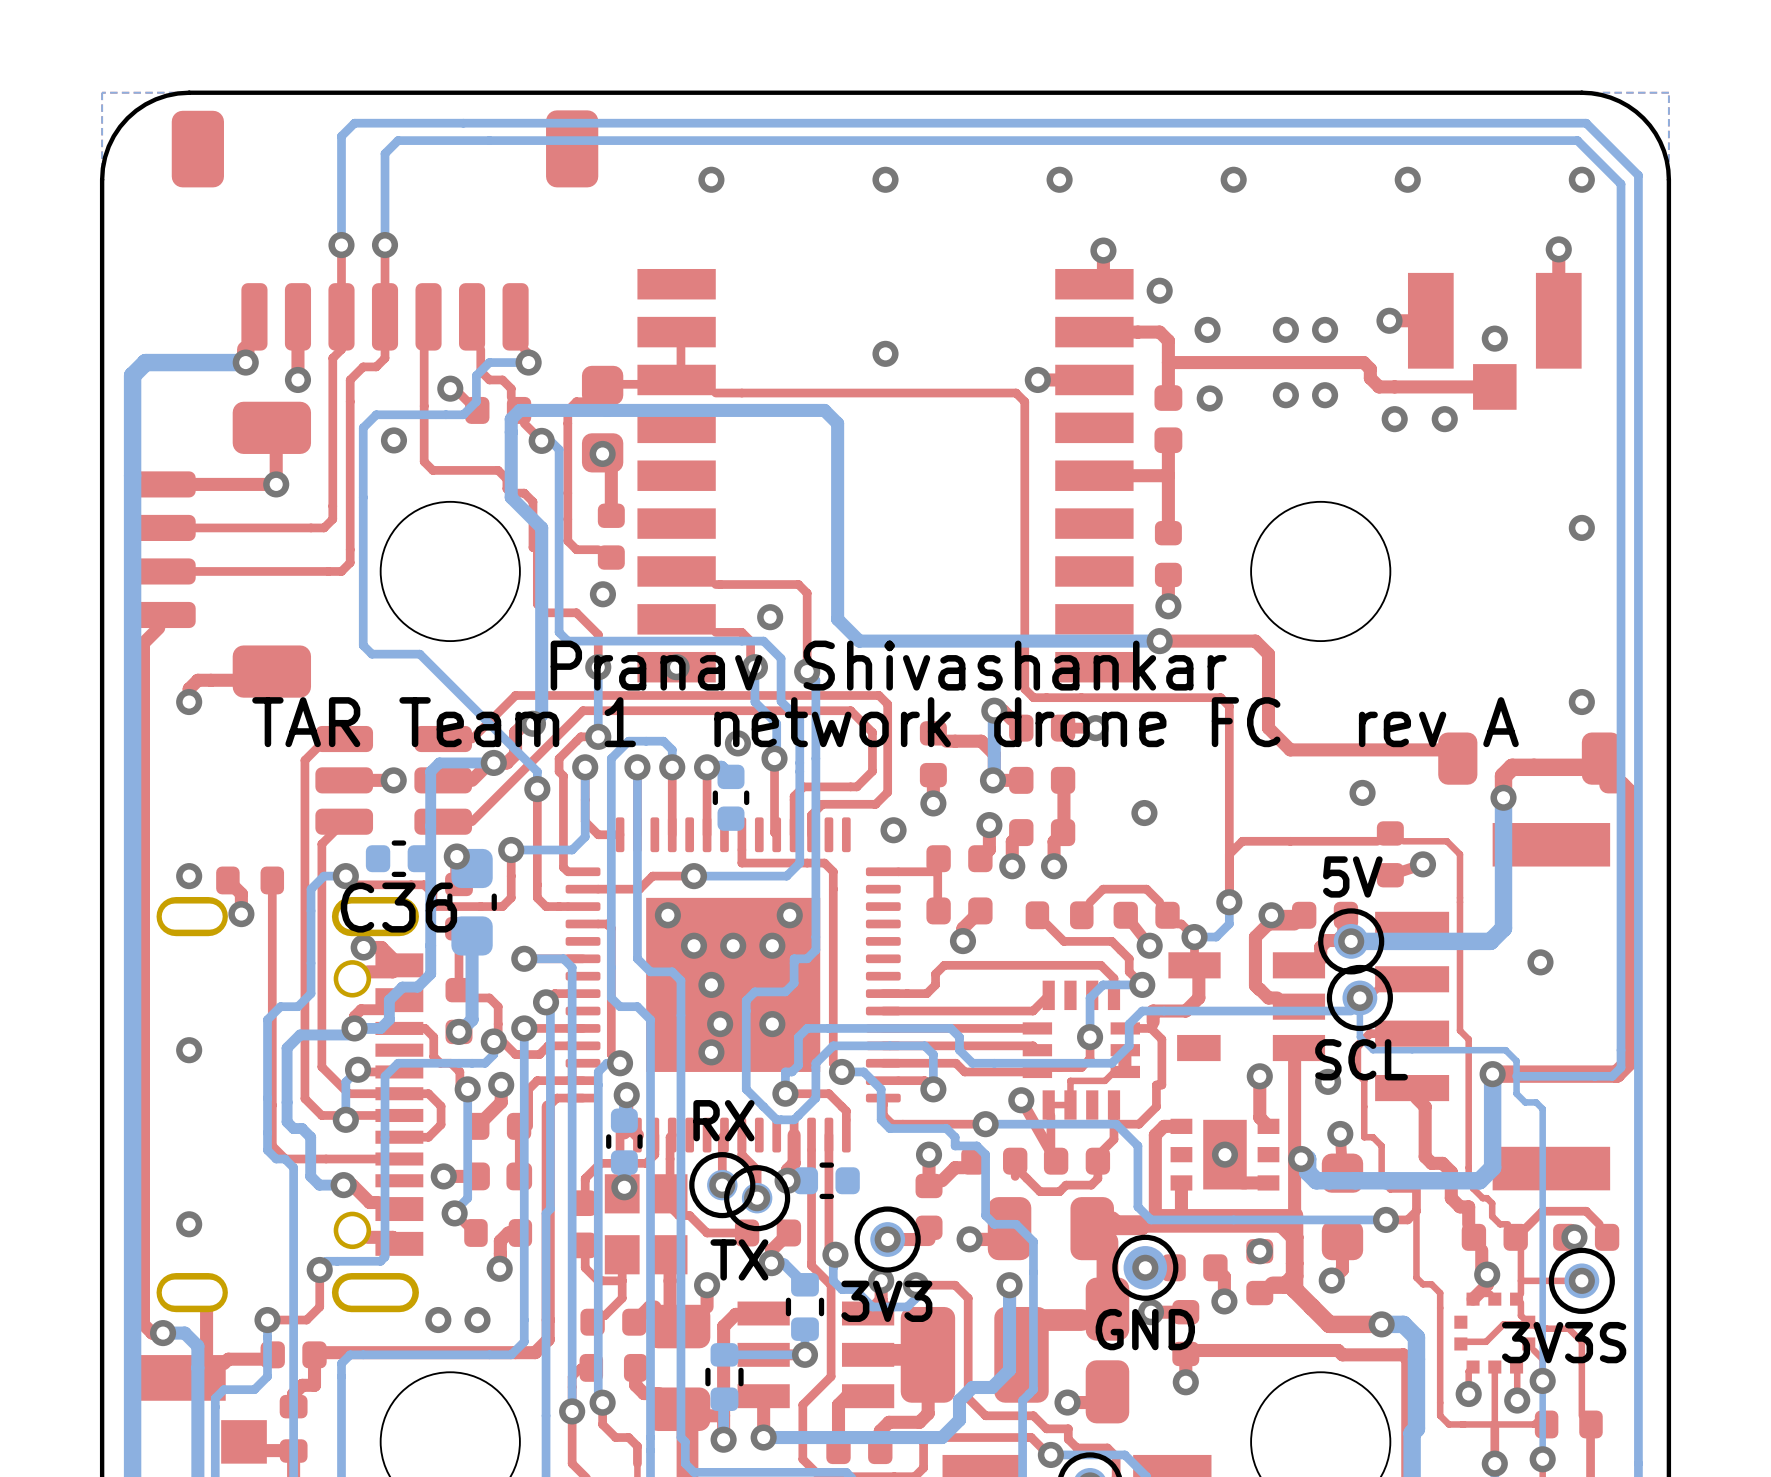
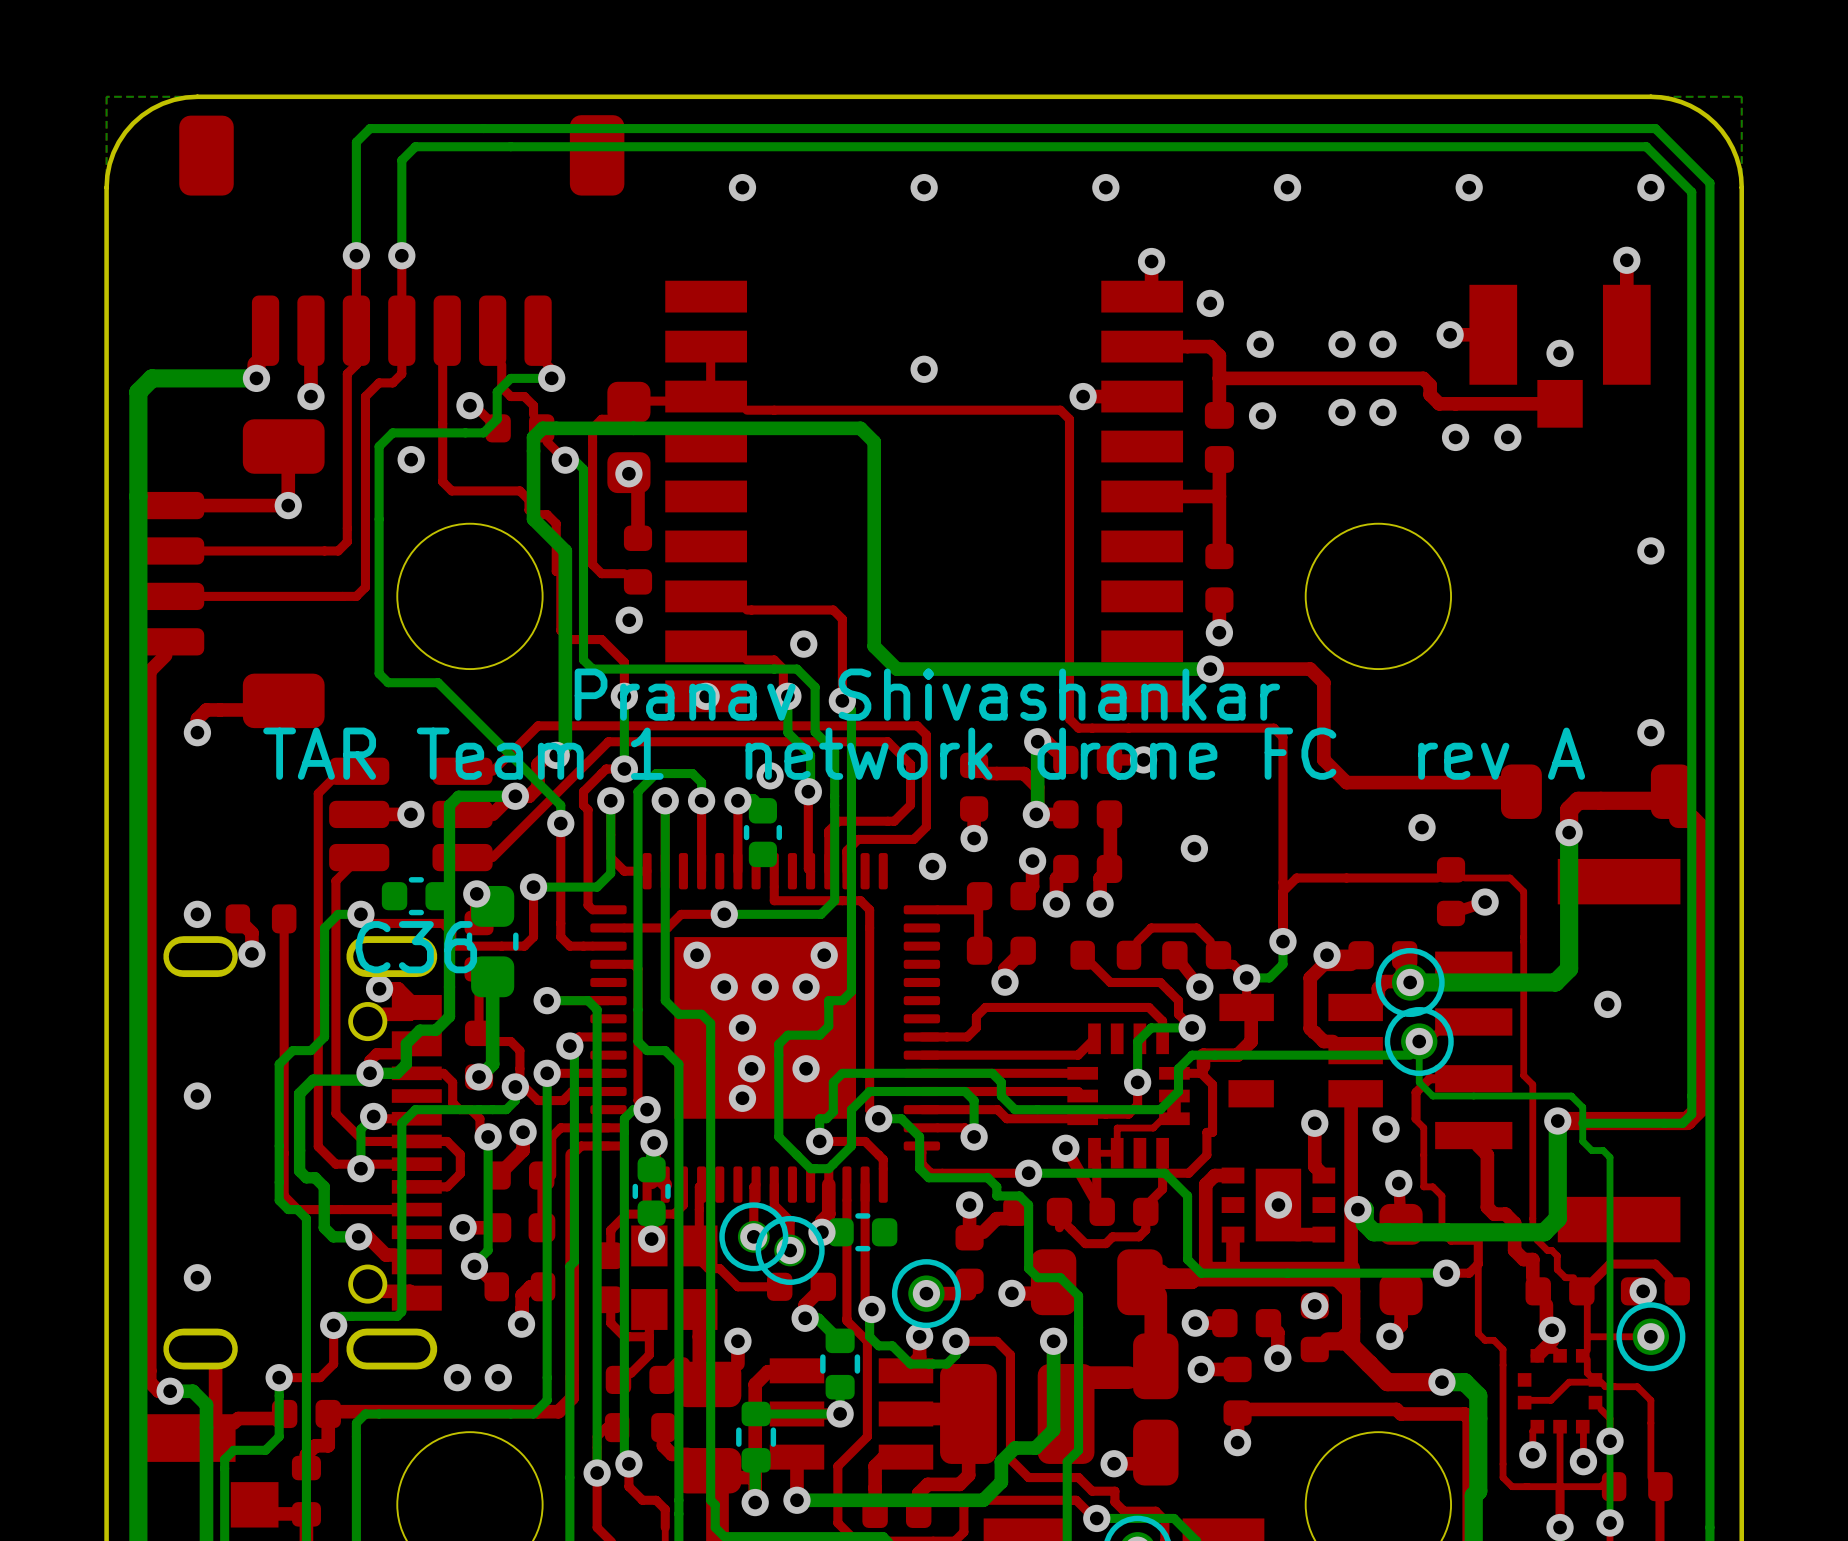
text: 5V (1352, 876) -> none
text: SCL (1361, 1059) -> none
text: RX (723, 1120) -> none
text: TX (739, 1259) -> none
part: (1145, 1267) -> none
text: 3V3 (886, 1301) -> none
text: GND (1145, 1329) -> none
text: 3V3S (1564, 1342) -> none

